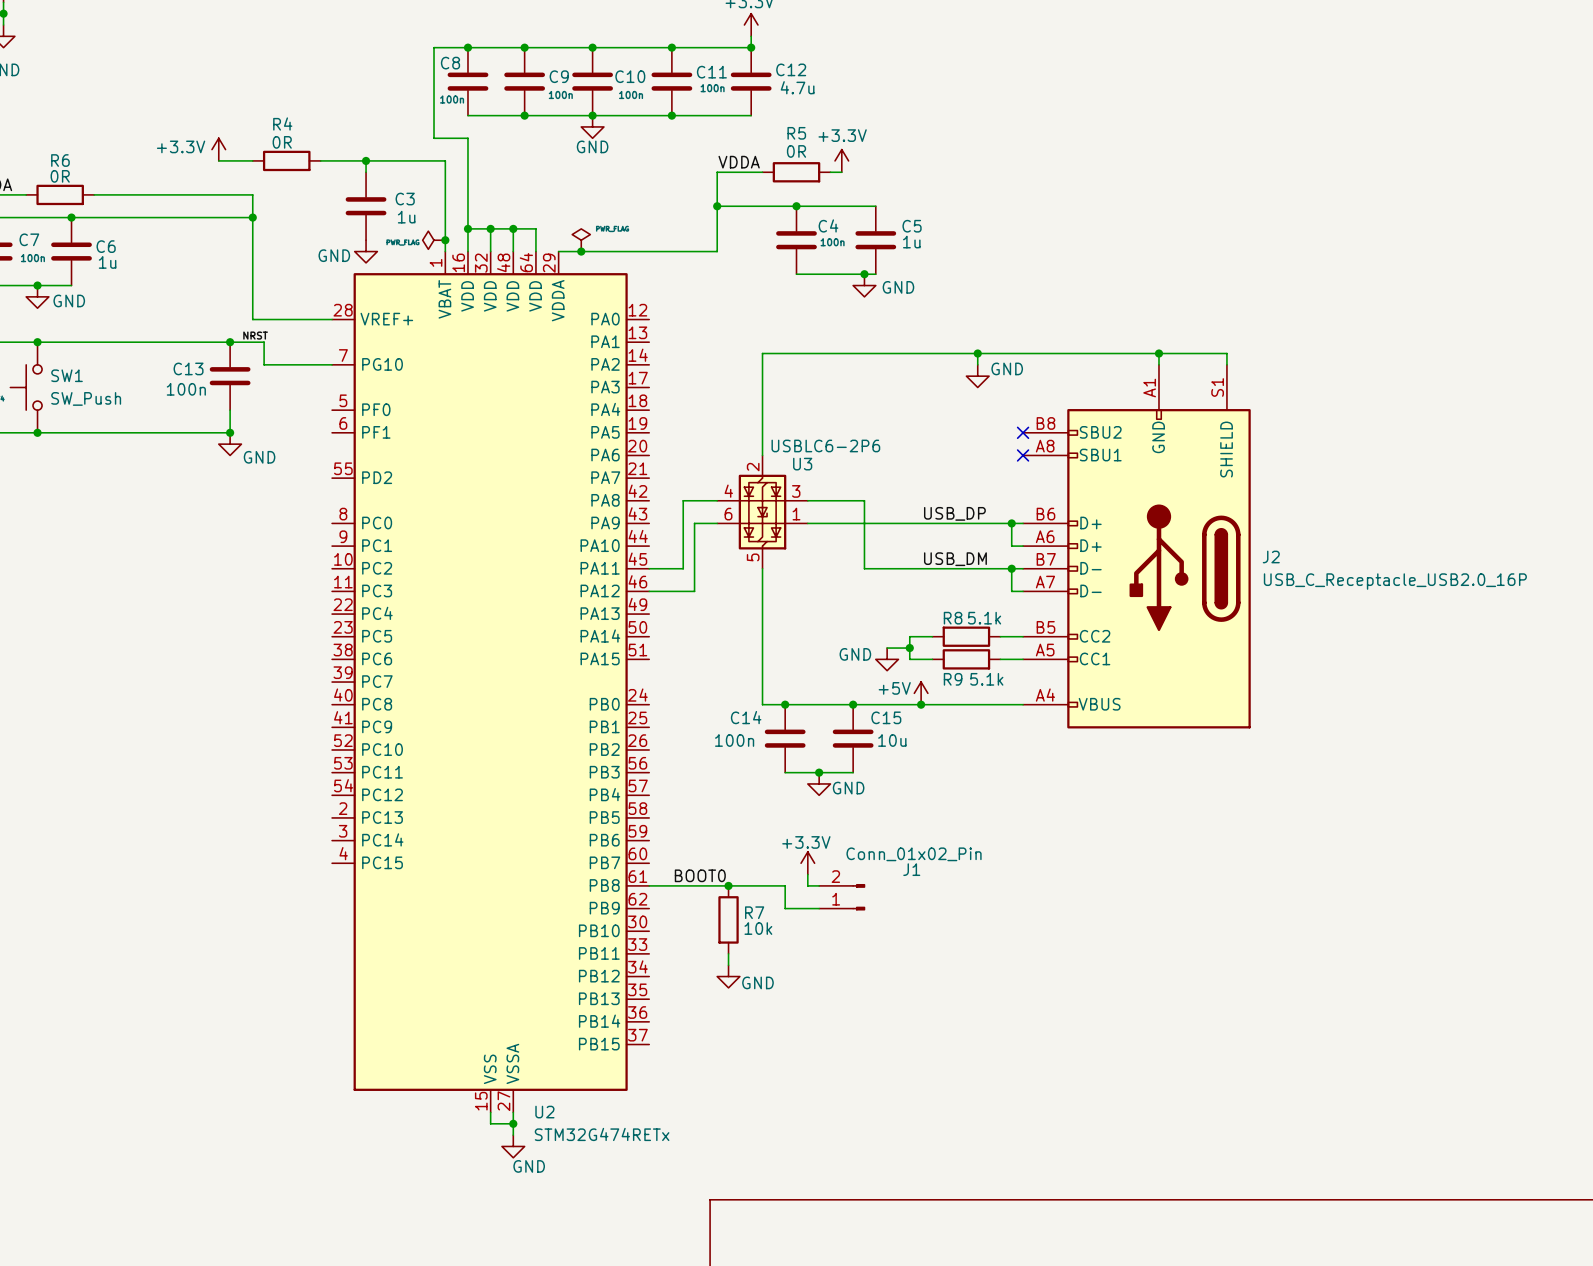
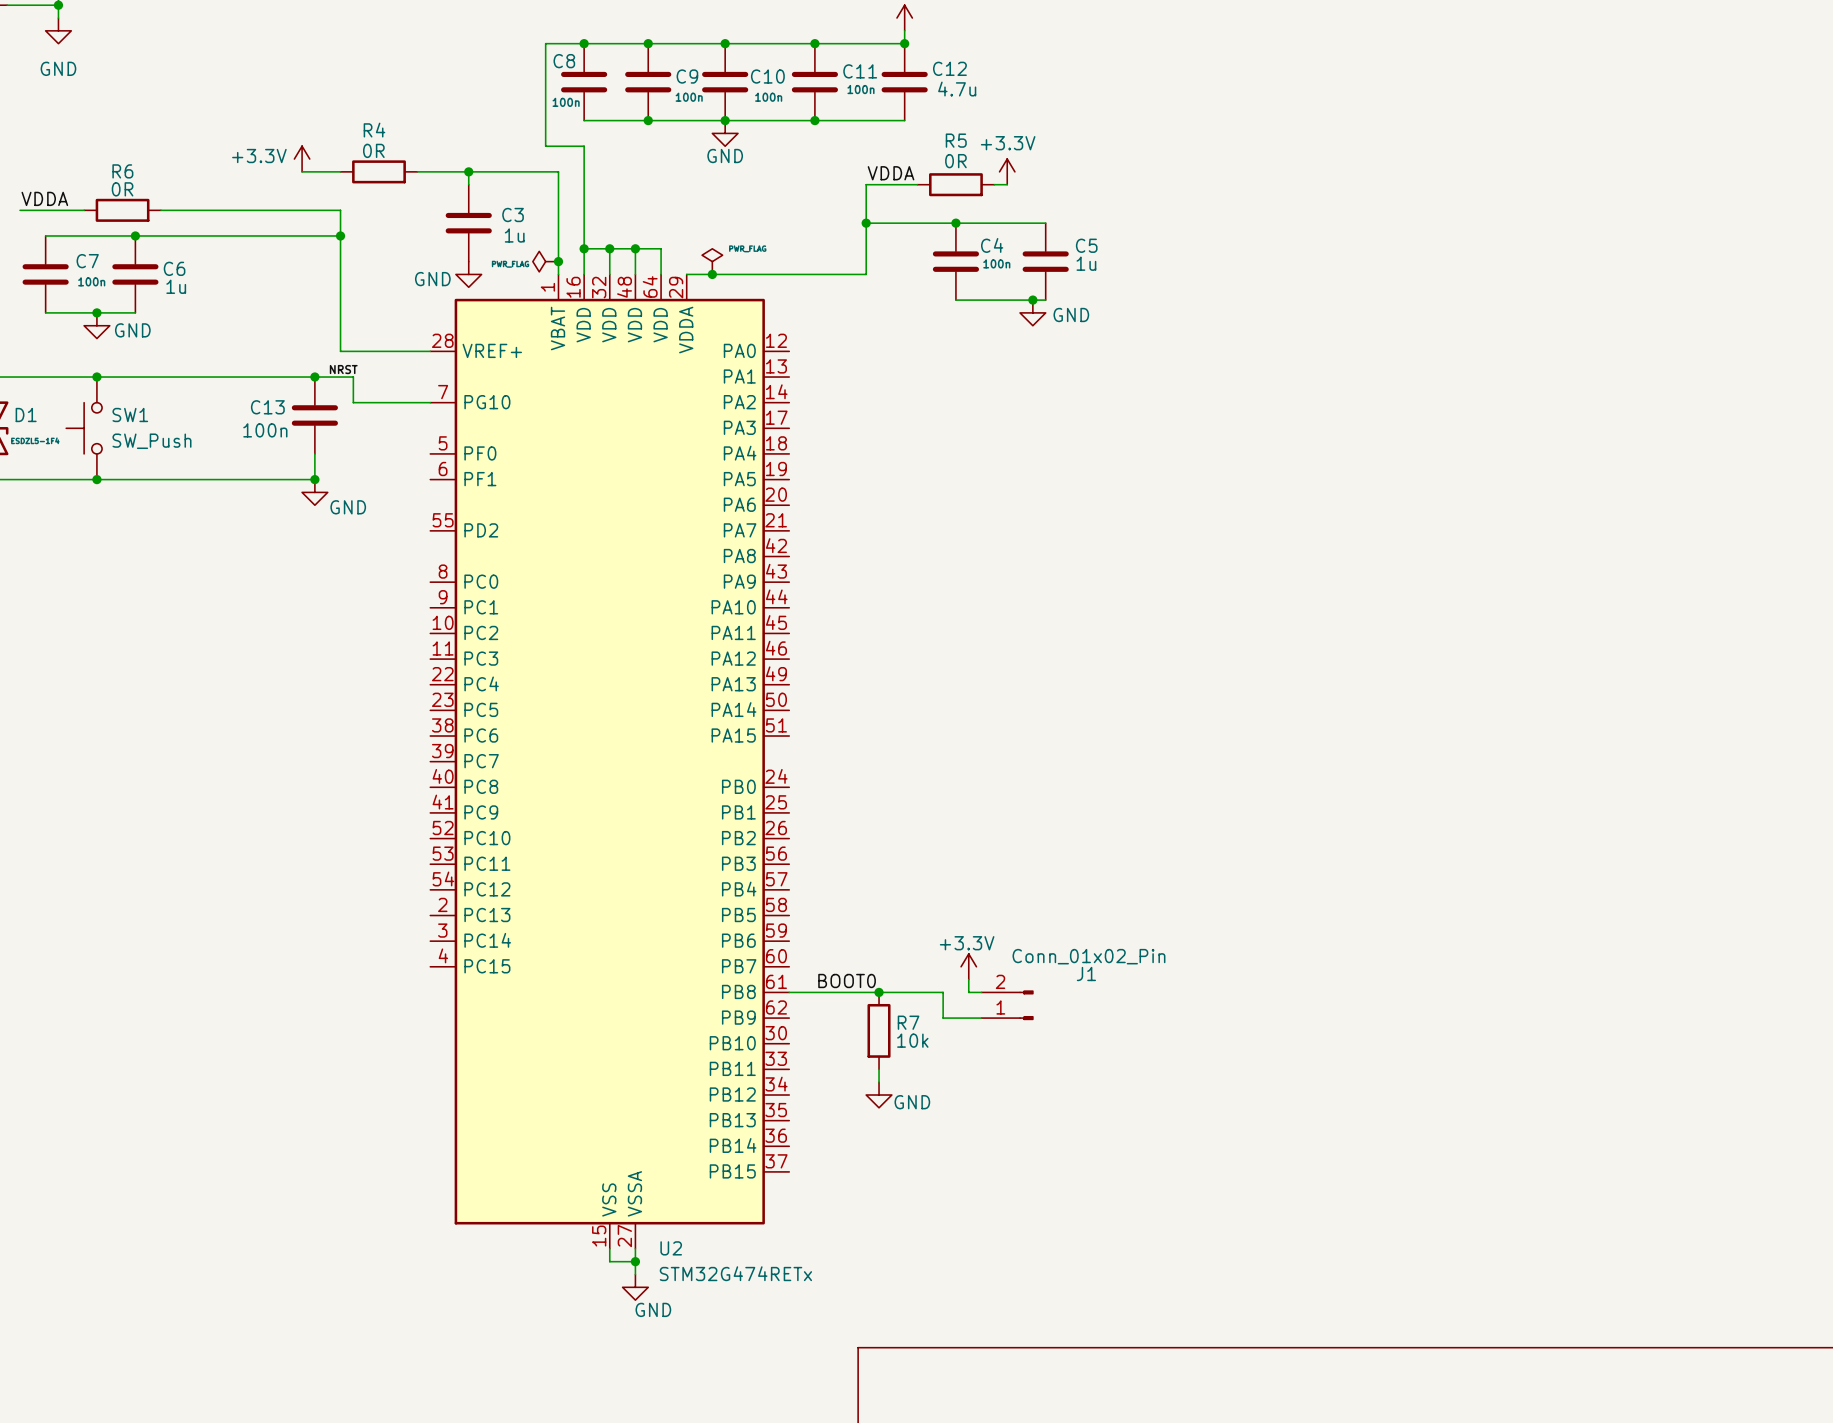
wire: (977, 353) (977, 364) -> none
junction: (977, 353) -> none
wire: (1158, 353) (1158, 364) -> none
junction: (1158, 353) -> none
wire: (1226, 364) (1226, 353) (762, 353) (762, 455) -> none
power symbol: GND (977, 376) -> none
no-connect mark: (1023, 432) -> none
no-connect mark: (1023, 455) -> none
wire: (717, 500) (683, 500) (683, 568) (649, 568) -> none
wire: (807, 500) (864, 500) (864, 568) (1023, 568) -> none
U3: USBLC6-2P6 (762, 512) -> none
label: USB_DP (954, 513) -> none
wire: (717, 523) (694, 523) (694, 591) (649, 591) -> none
wire: (807, 523) (1023, 523) -> none
wire: (1011, 523) (1011, 546) (1023, 546) -> none
junction: (1011, 523) -> none
J2: USB_C_Receptacle_USB2.0_16P (1136, 546) -> none
label: USB_DM (955, 559) -> none
wire: (762, 568) (762, 704) (1023, 704) -> none
wire: (1011, 568) (1011, 591) (1023, 591) -> none
junction: (1011, 568) -> none
wire: (932, 636) (909, 636) (909, 659) (932, 659) -> none
R8: 5.1k (966, 636) -> none
wire: (1000, 636) (1023, 636) -> none
wire: (887, 648) (909, 648) -> none
junction: (909, 648) -> none
power symbol: GND (887, 659) -> none
R9: 5.1k (966, 659) -> none
wire: (1000, 659) (1023, 659) -> none
power symbol: +5V (921, 693) -> none
junction: (785, 704) -> none
junction: (853, 704) -> none
junction: (921, 704) -> none
C14: 100n (785, 738) -> none
C15: 10u (853, 738) -> none
wire: (785, 772) (853, 772) -> none
junction: (819, 772) -> none
power symbol: GND (819, 783) -> none

